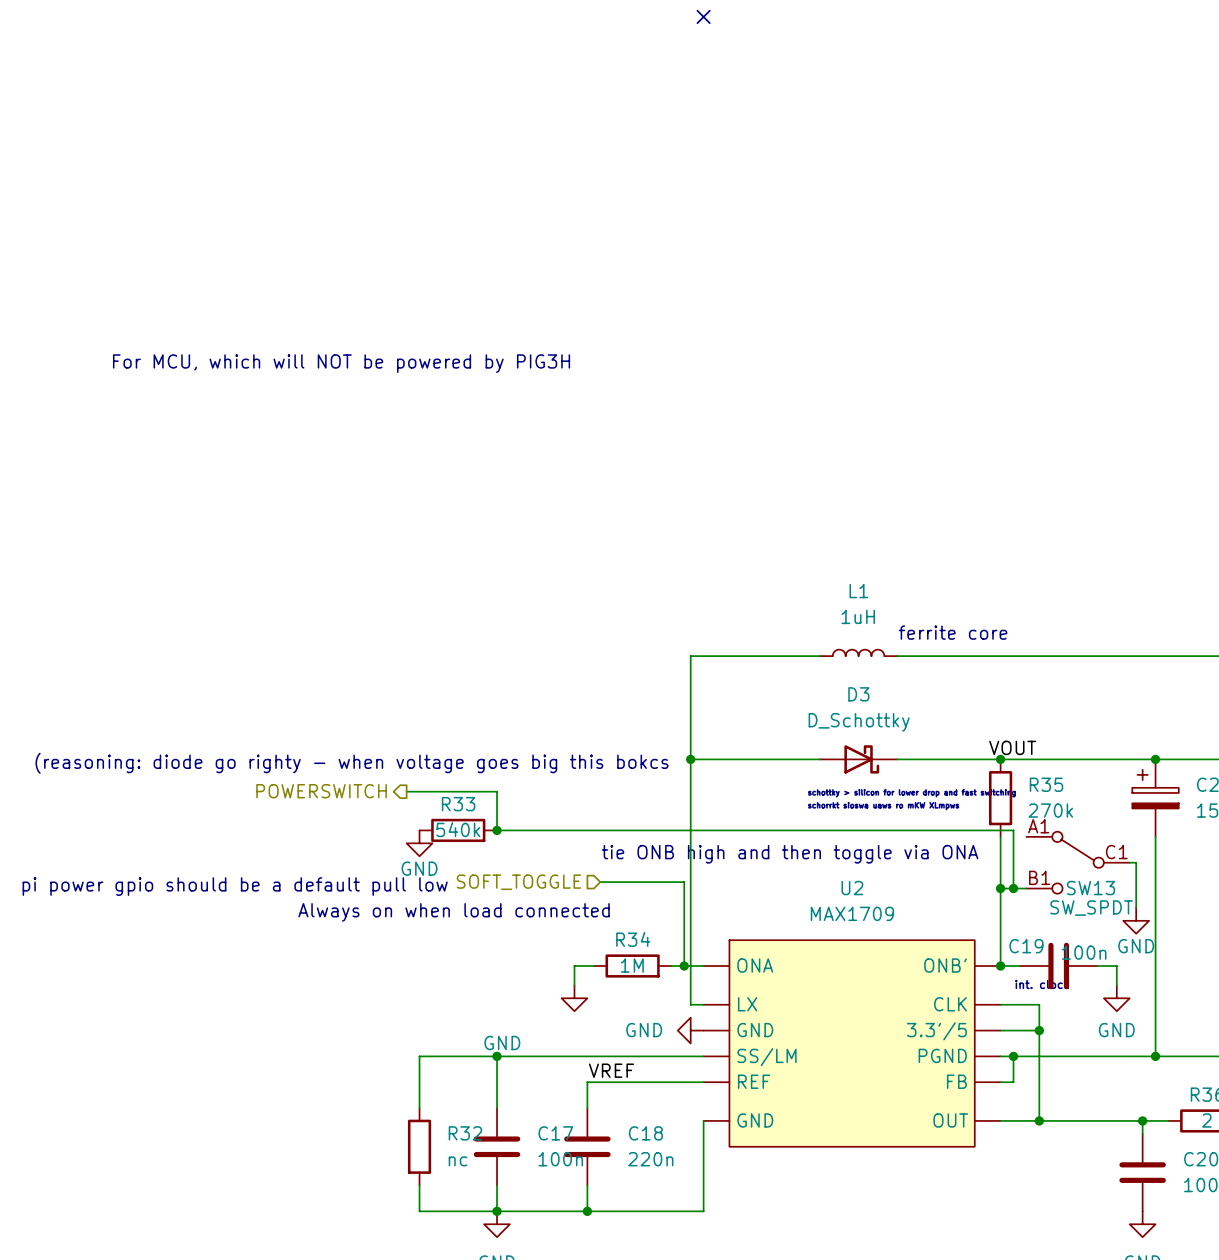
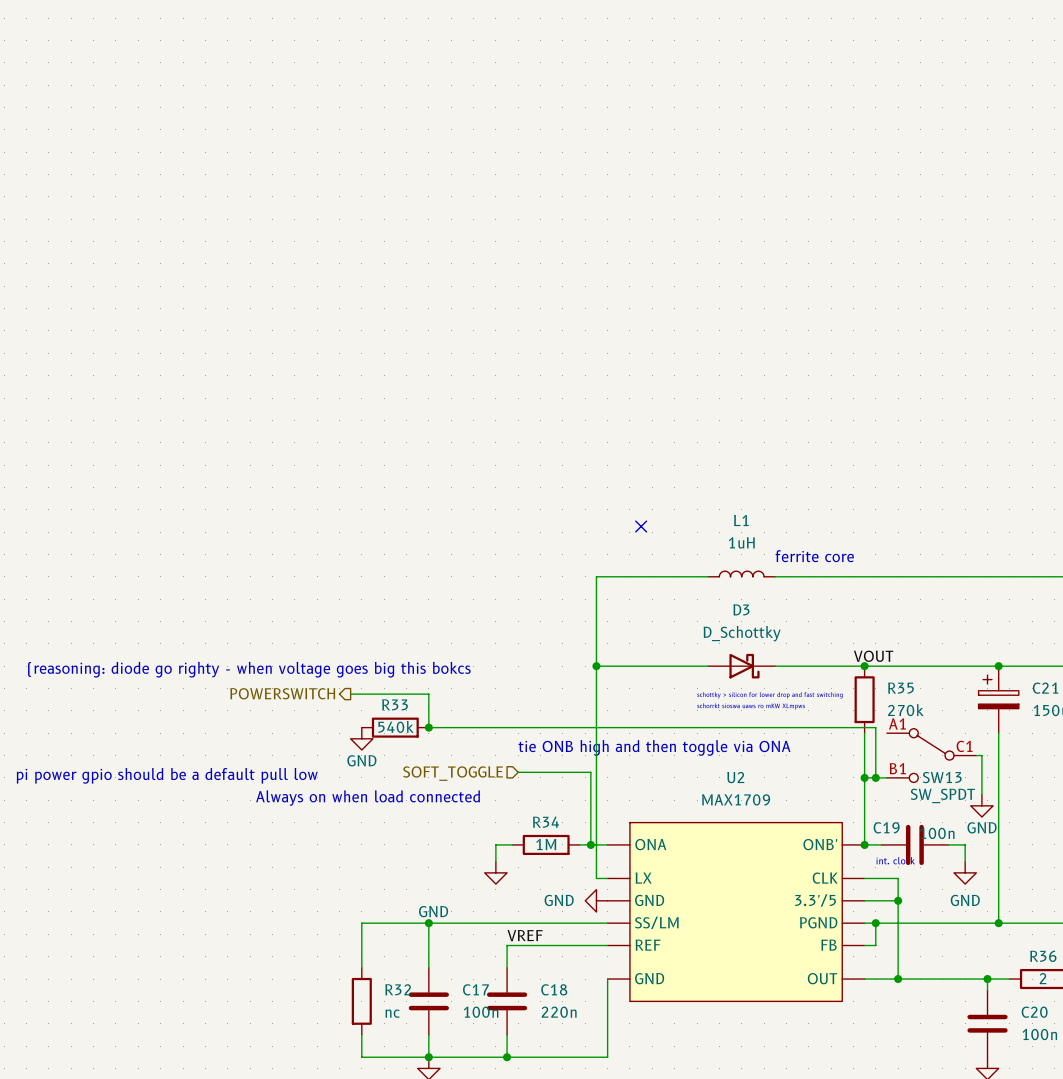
no-connect mark: (703, 16) -> none
text: For MCU, which will NOT be powered by PIG3H (341, 363) -> none
no-connect mark: none -> (641, 526)

